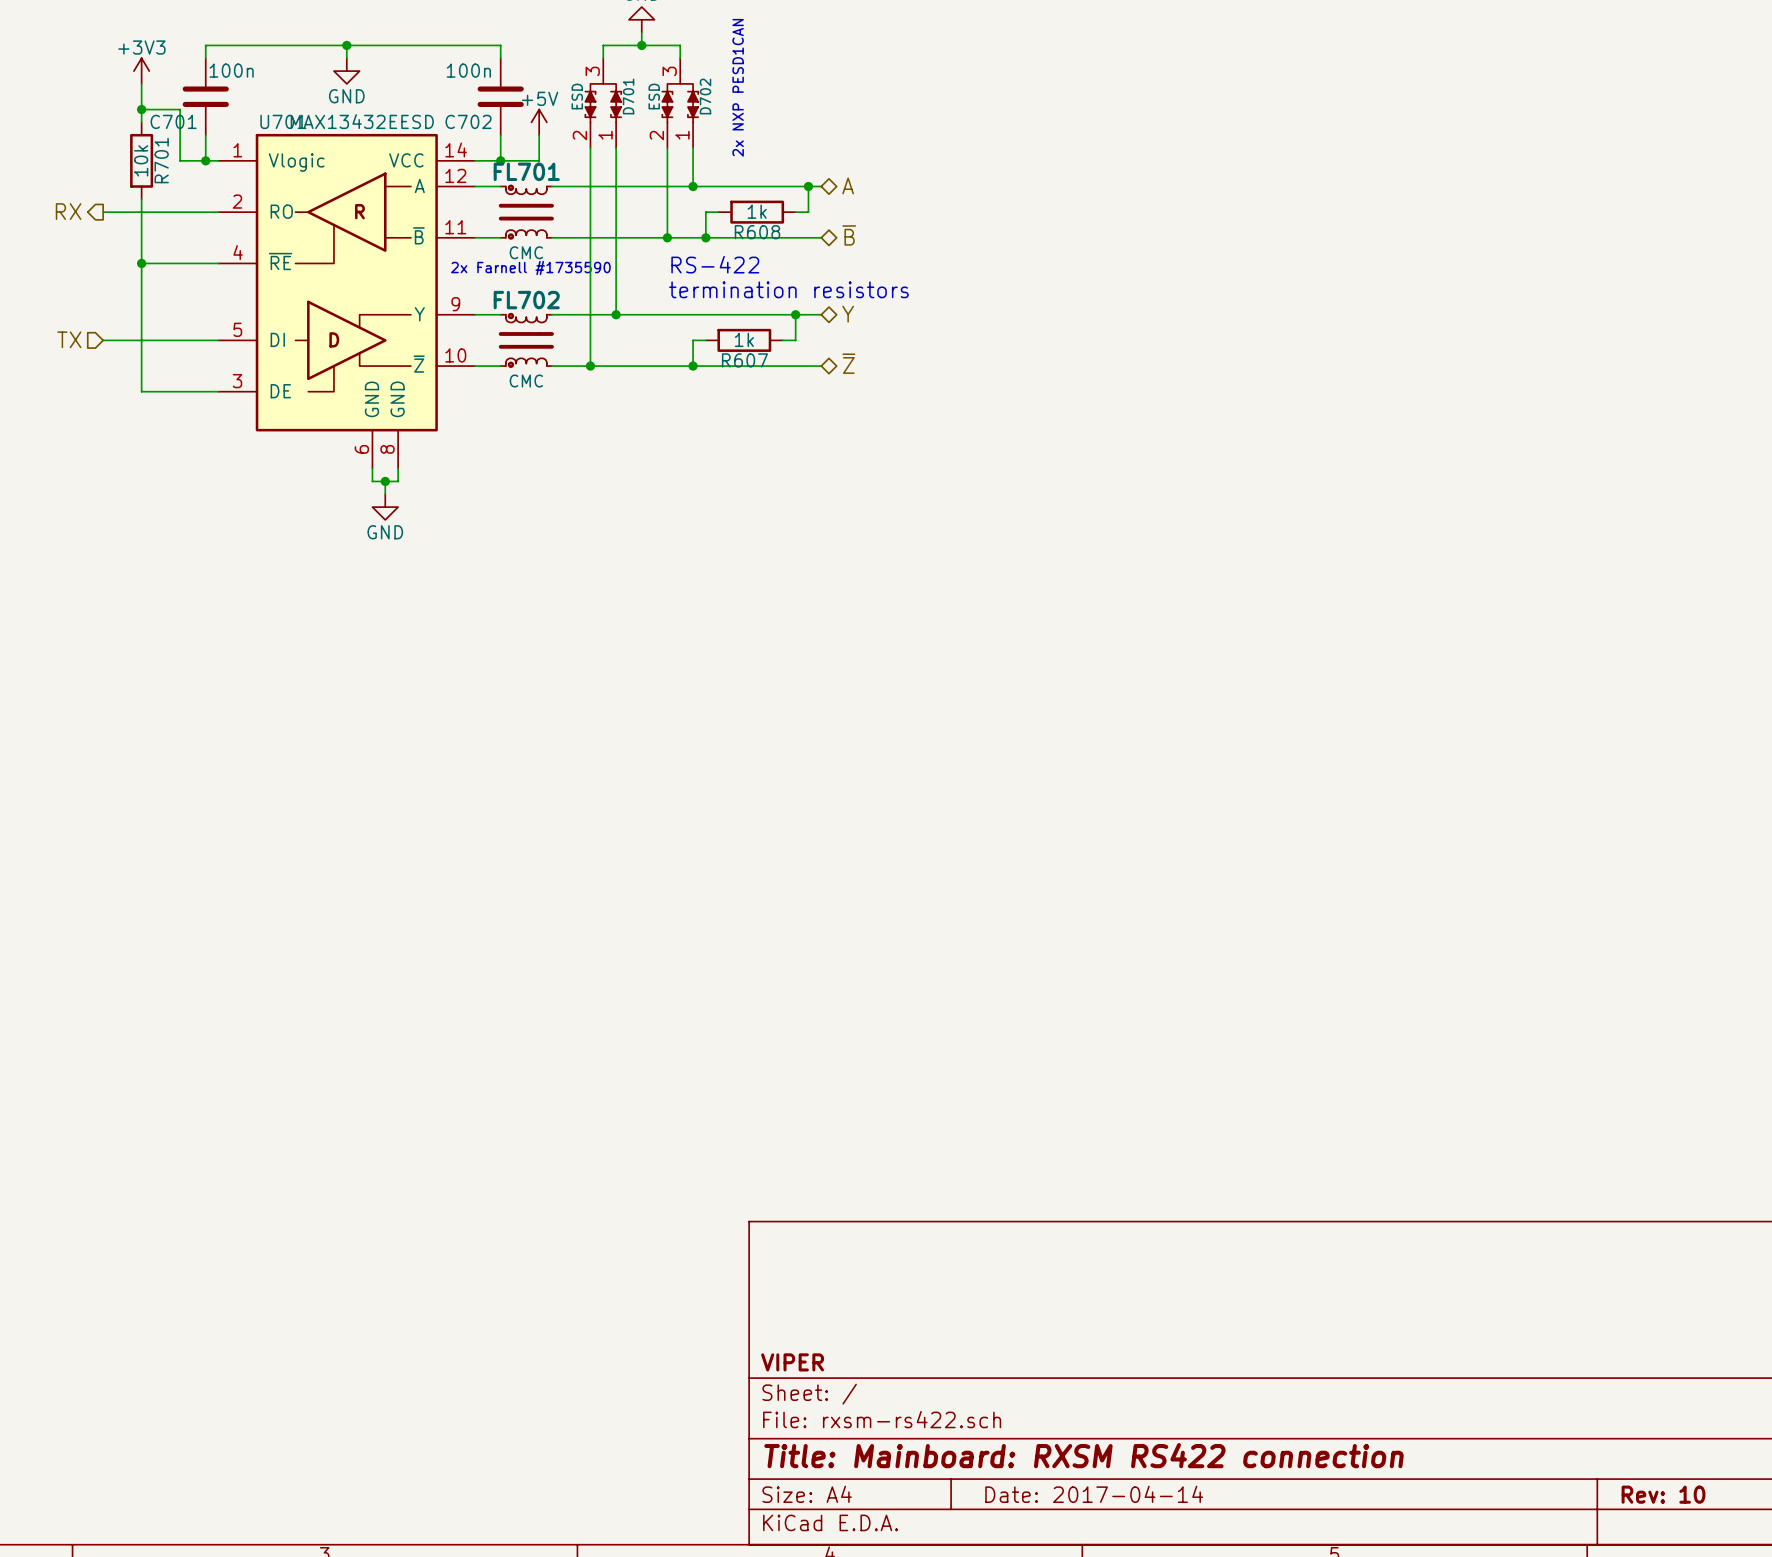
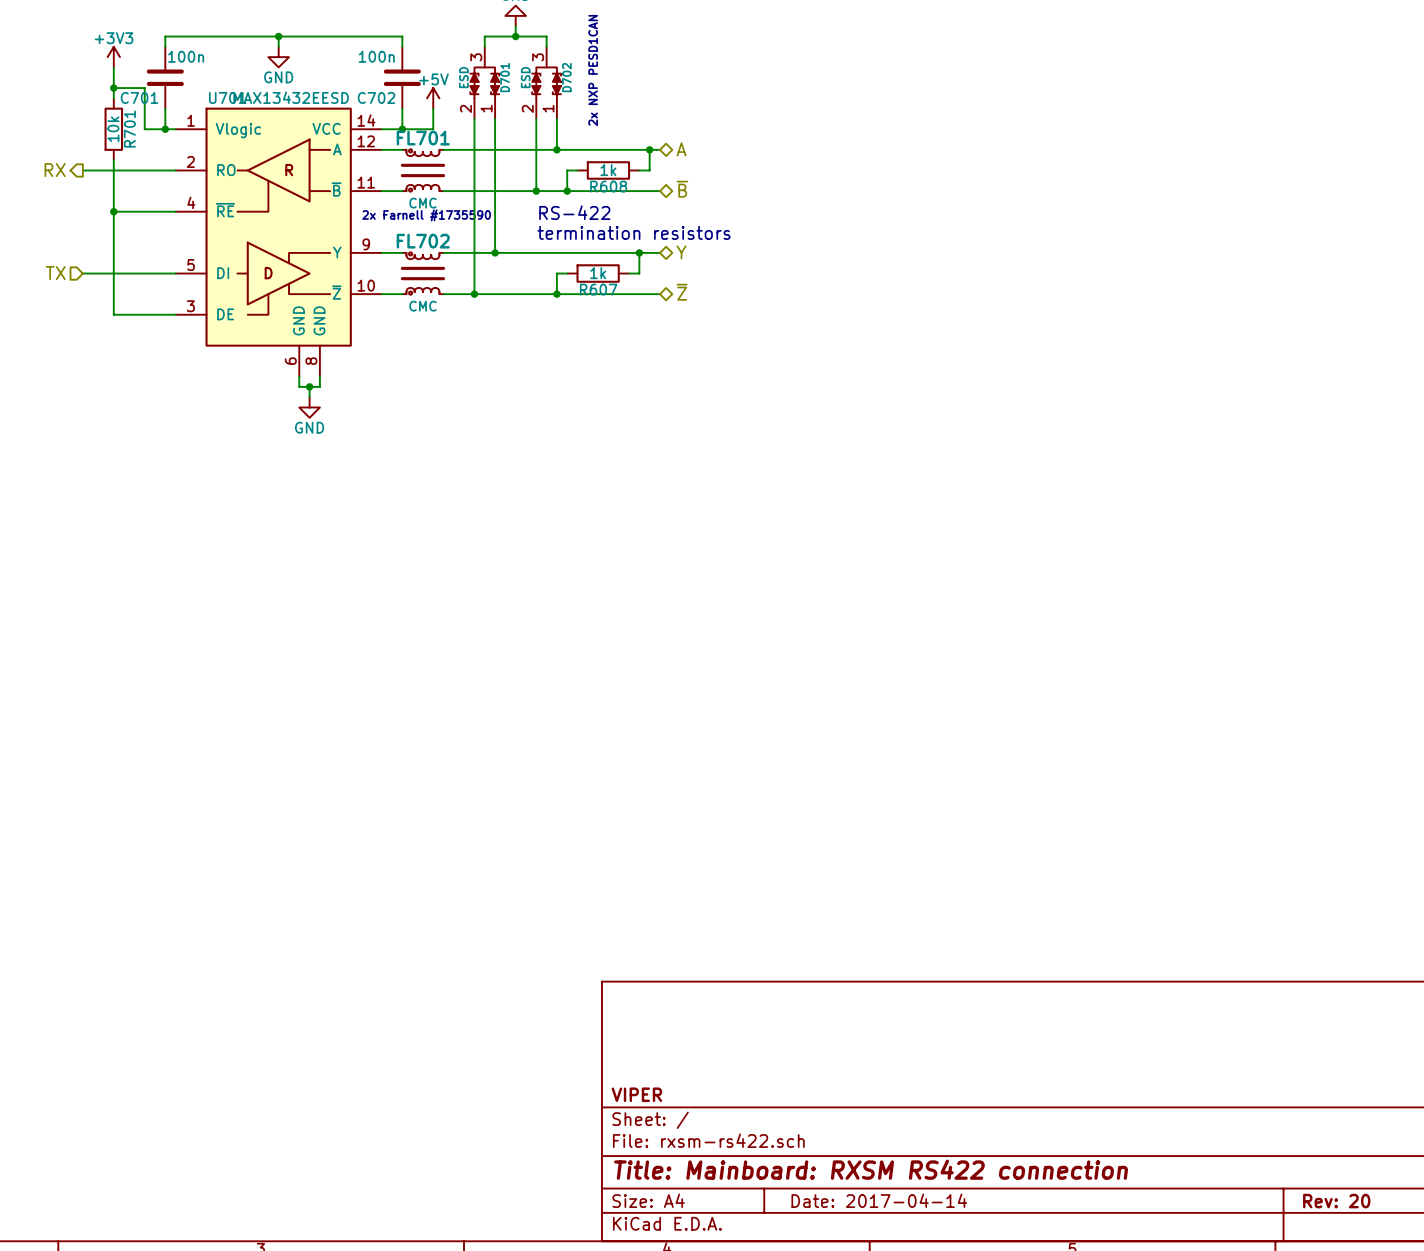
title block: Rev: 10 (1663, 1494) -> Rev: 20 (1336, 1201)

